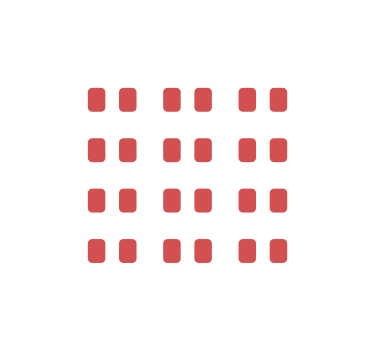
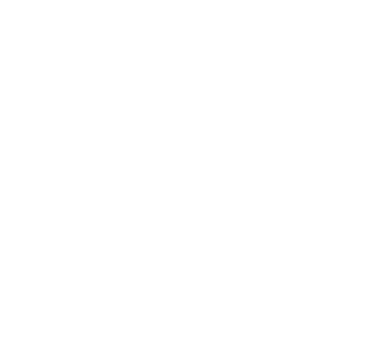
part: (112, 99) -> none
part: (187, 99) -> none
part: (262, 99) -> none
part: (112, 150) -> none
part: (187, 150) -> none
part: (262, 150) -> none
part: (112, 200) -> none
part: (187, 200) -> none
part: (262, 200) -> none
part: (112, 250) -> none
part: (187, 250) -> none
part: (262, 250) -> none

